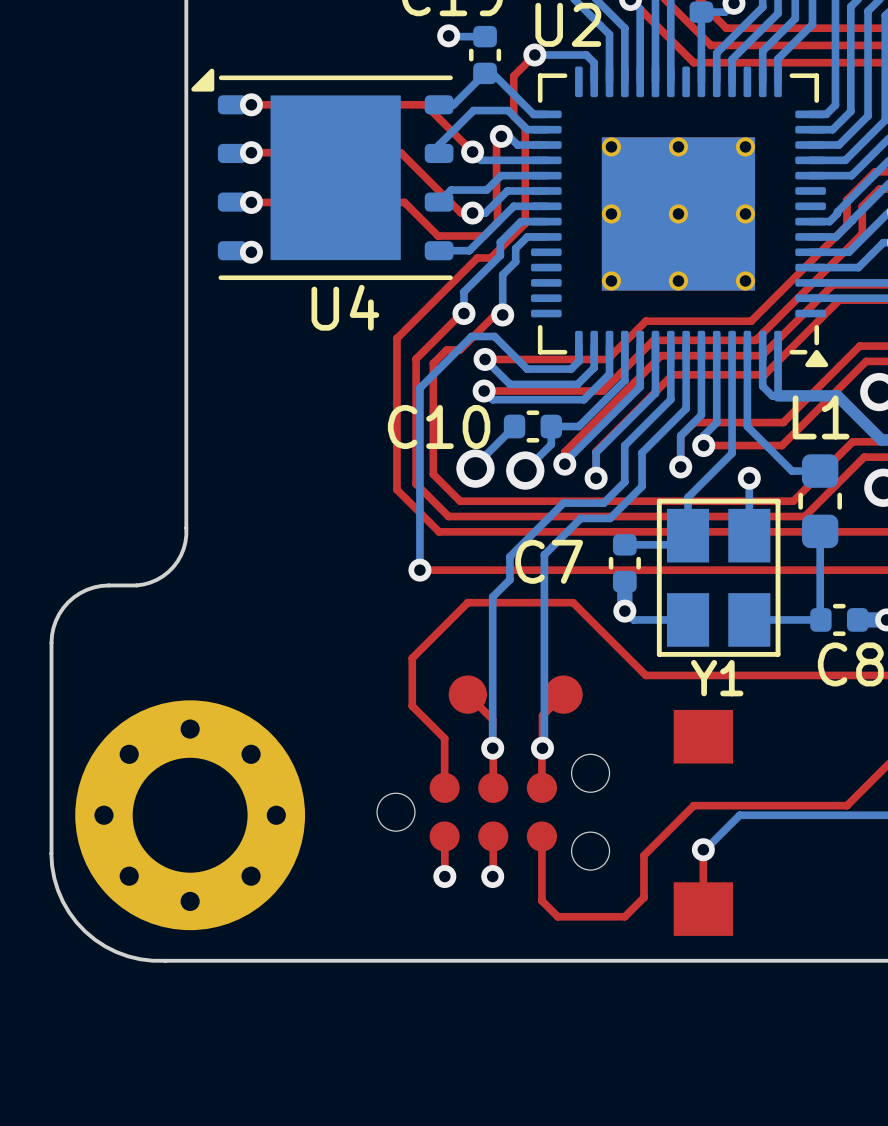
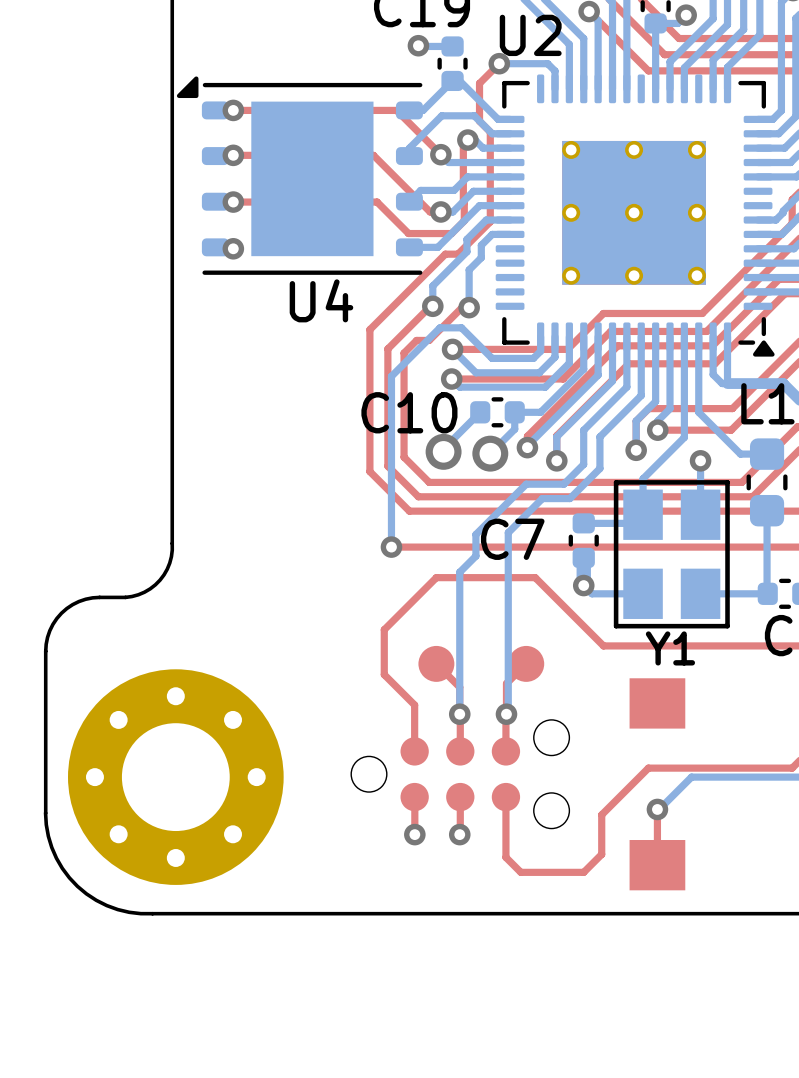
board edge: (186, 528) (185, 542) (181, 555) (173, 567) (162, 576) (143, 584) (94, 587) (80, 593) (68, 602) (59, 614) (53, 628) (51, 681) -> (172, 507) (171, 556) (167, 569) (160, 580) (150, 588) (138, 594) (125, 597) (92, 597) (72, 604) (61, 613) (52, 624) (47, 637) (45, 651)

